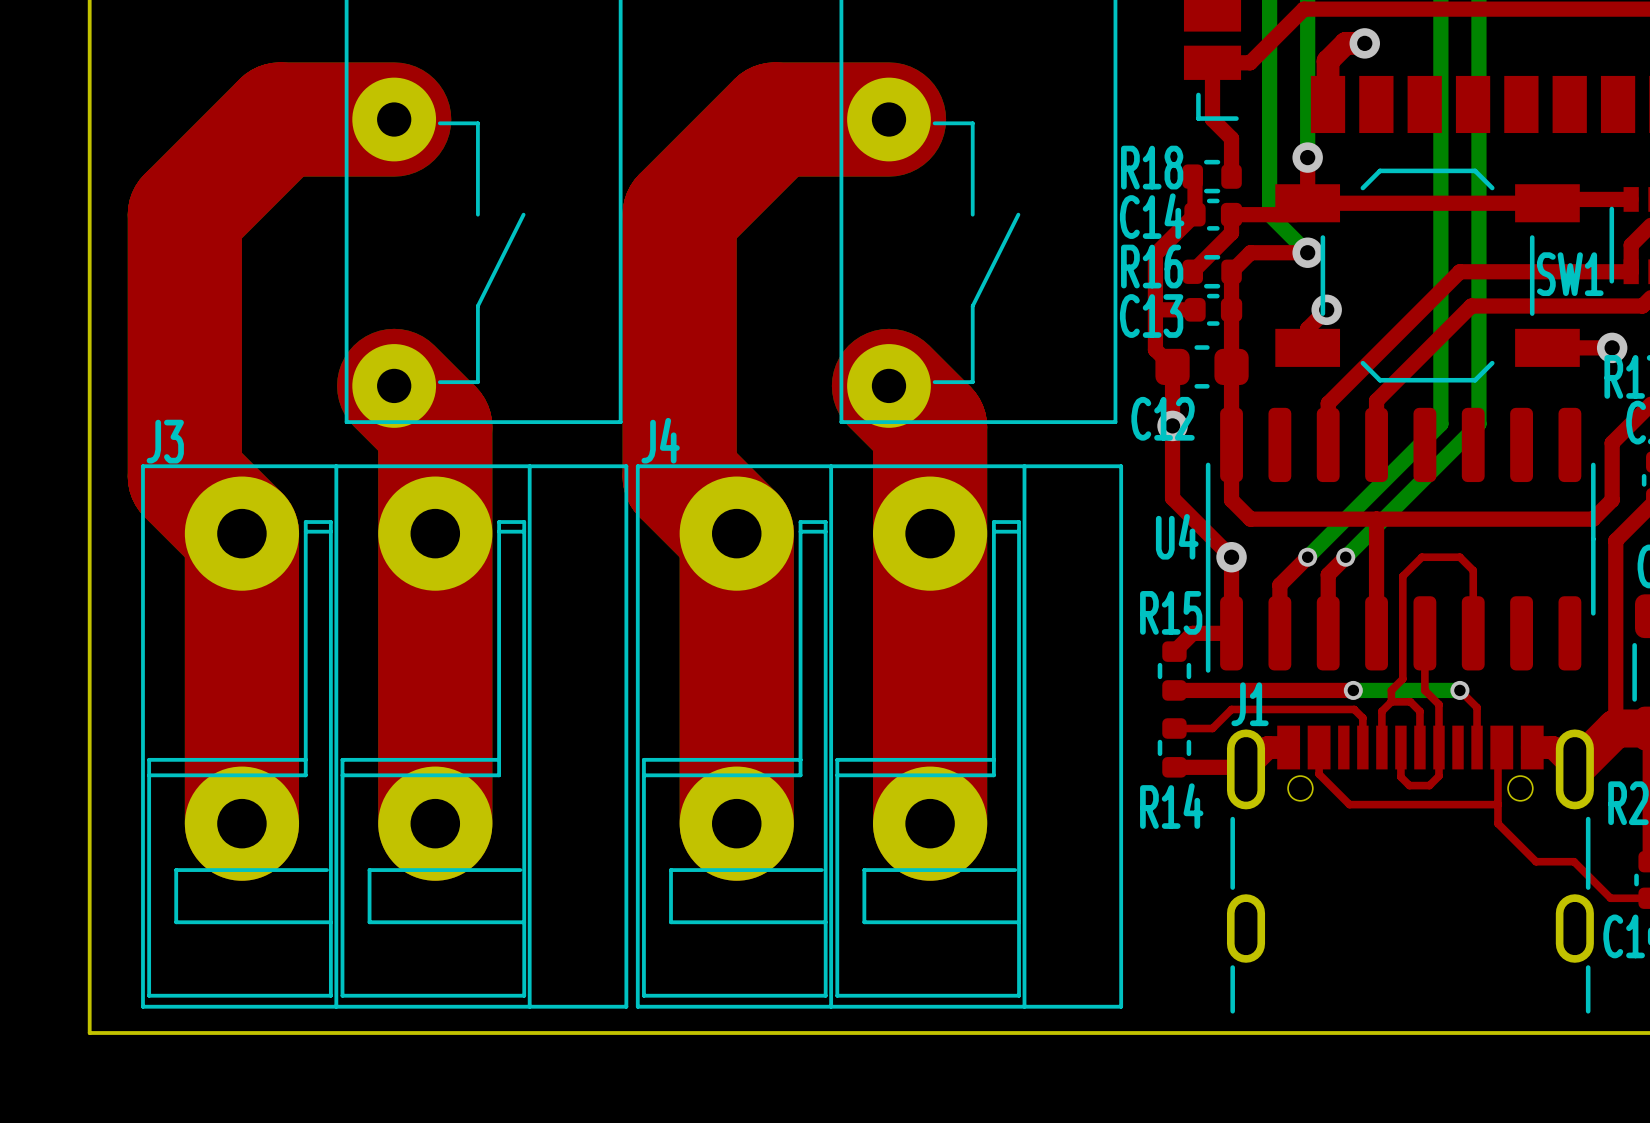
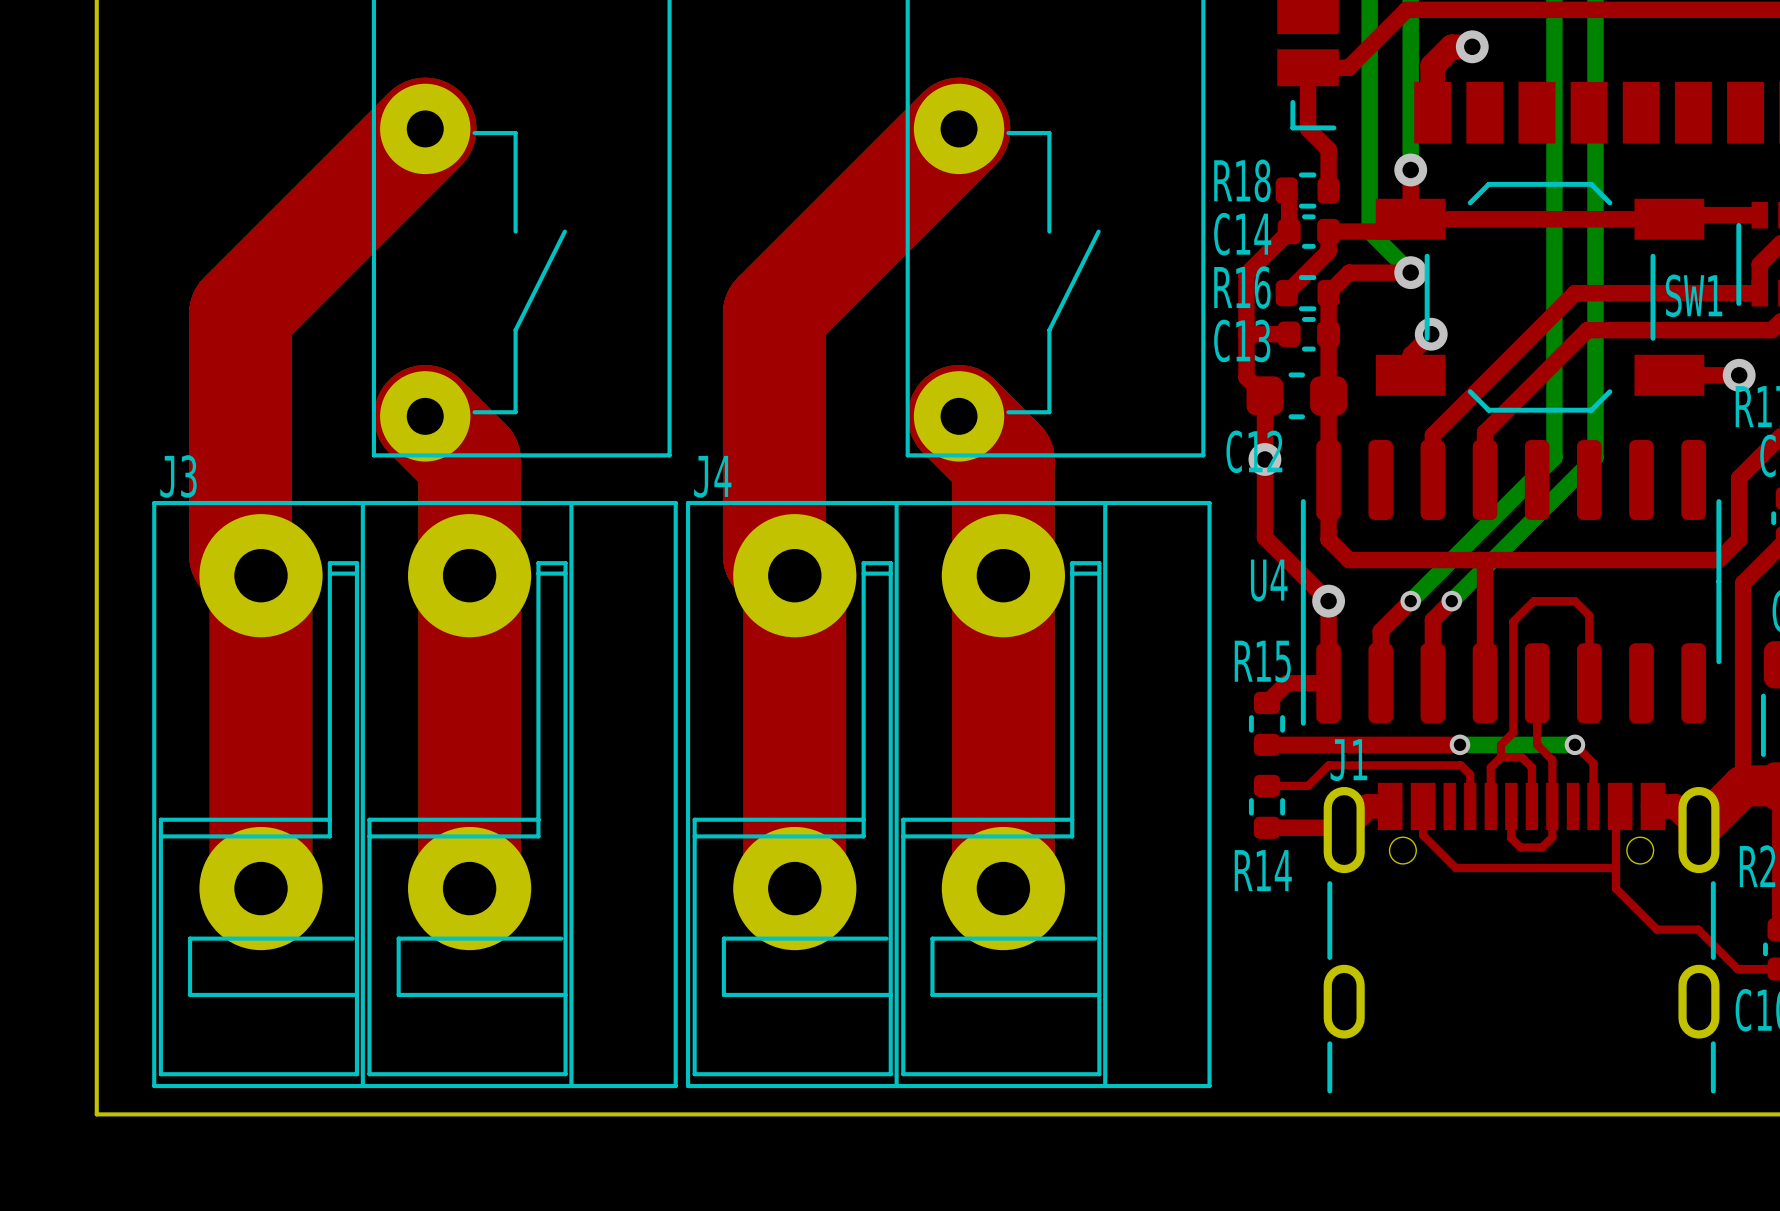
top track: (394, 119) (280, 119) (184, 214) (184, 476) (222, 514) -> (425, 128) (240, 313) (240, 555)
top track: (888, 119) (774, 119) (679, 214) (679, 476) (717, 514) -> (959, 128) (774, 313) (774, 555)
top track width: thick (394, 385) (435, 427) (435, 823) -> thin (425, 416) (469, 460) (469, 888)
top track width: thick (888, 385) (930, 427) (930, 823) -> thin (959, 416) (1003, 460) (1003, 888)
top track width: thick (222, 514) (241, 533) (241, 823) -> thin (240, 555) (261, 575) (261, 888)
top track width: thick (717, 514) (736, 533) (736, 823) -> thin (774, 555) (794, 575) (794, 888)

